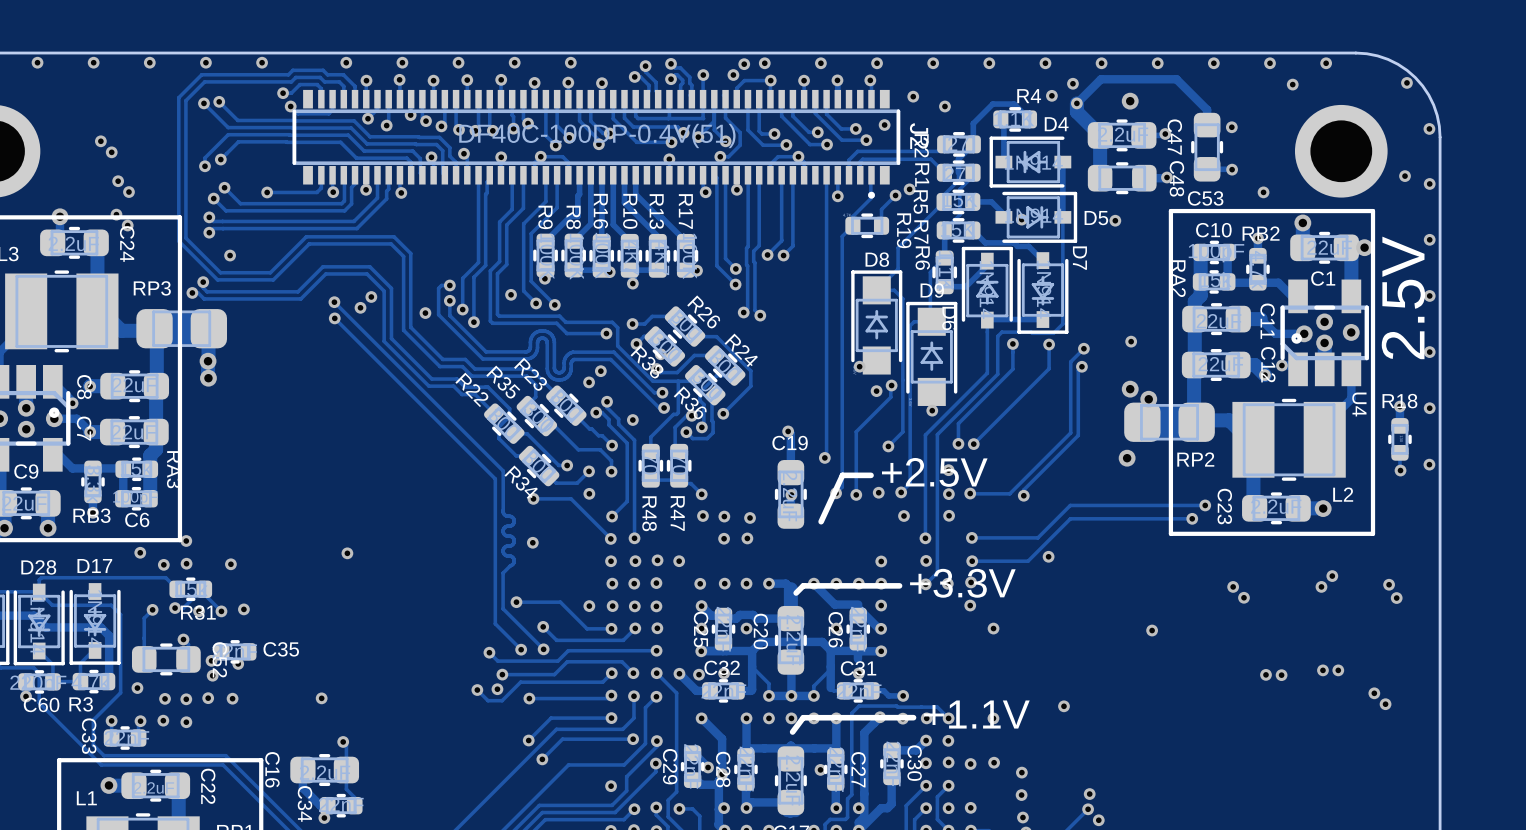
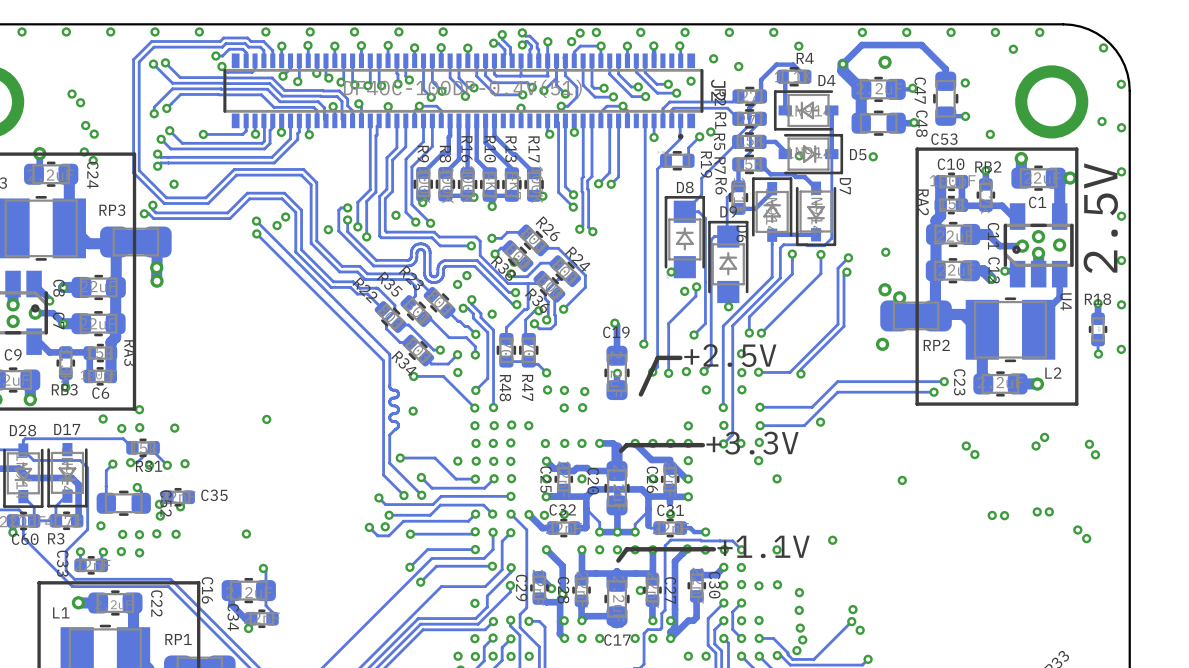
via: (1045, 63) -> none
via: none -> (798, 46)
via: (1072, 83) -> none
via: (1051, 95) -> none

